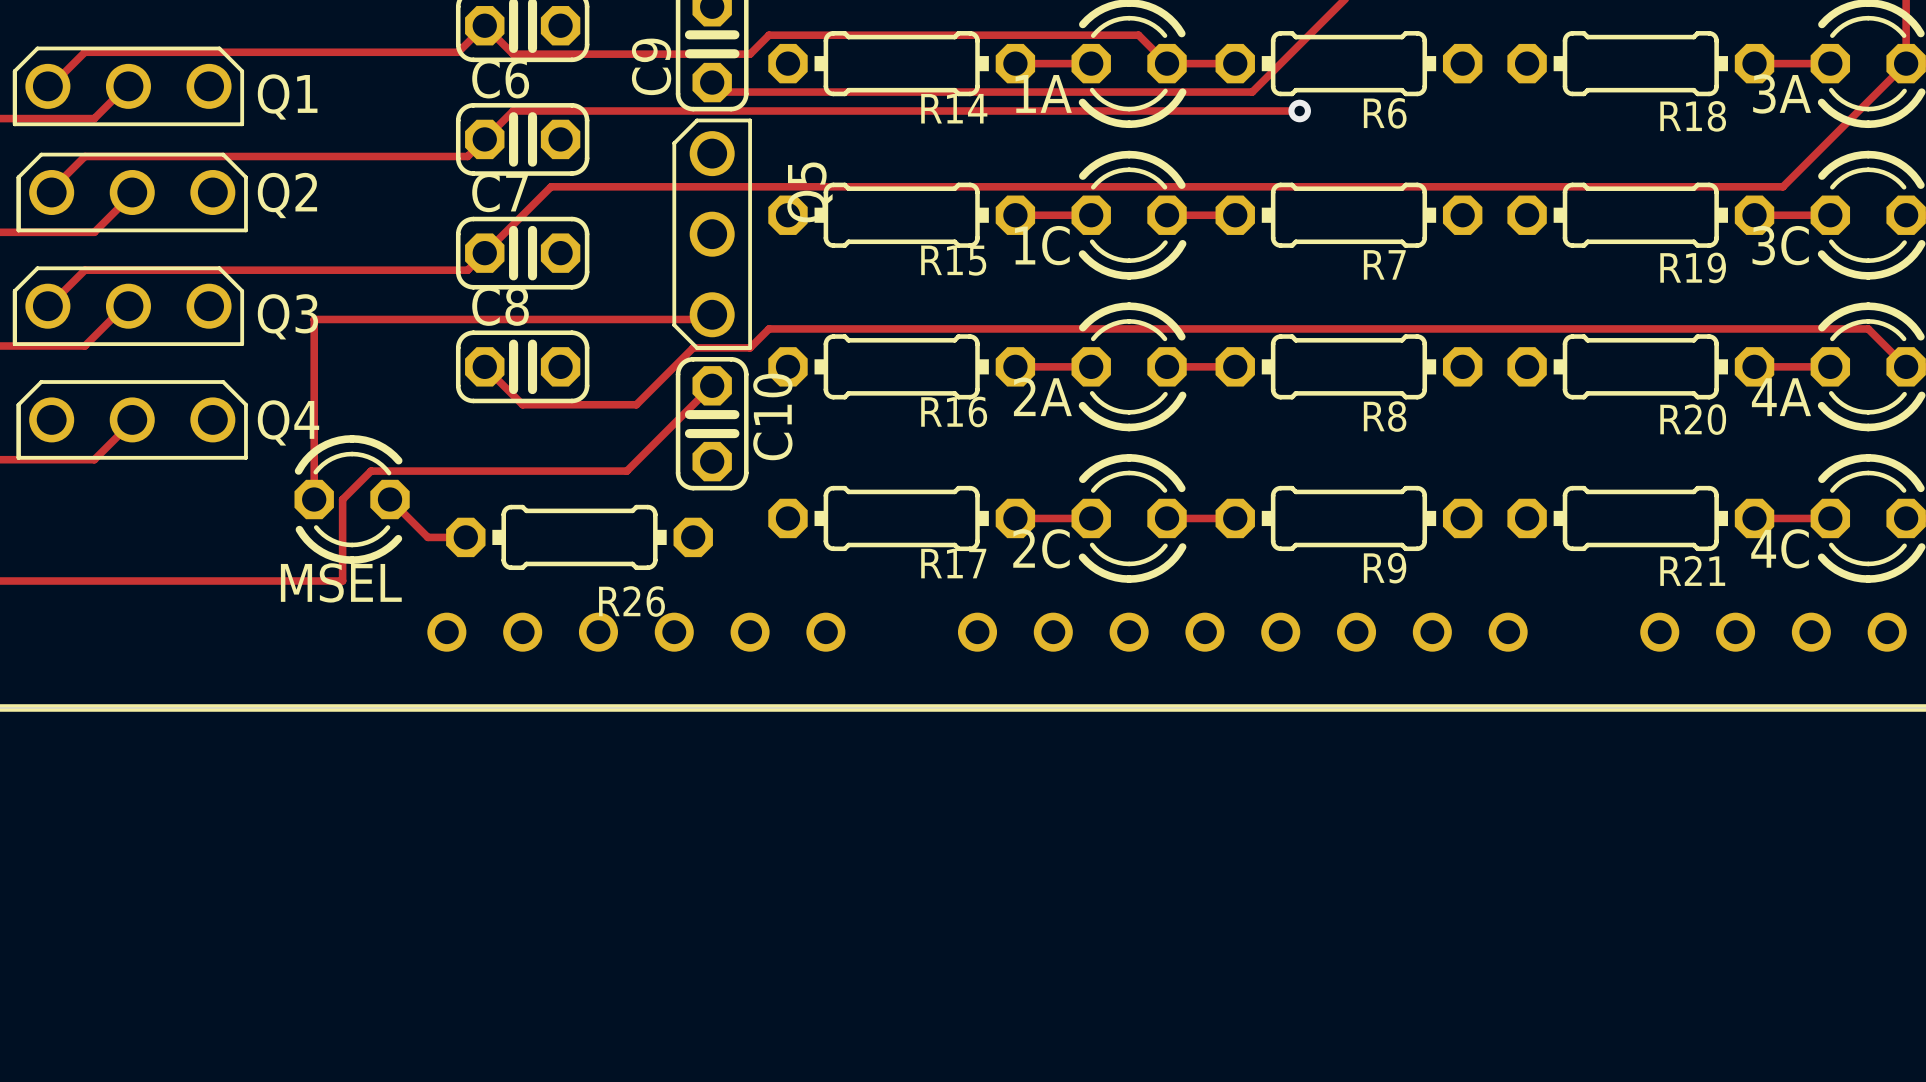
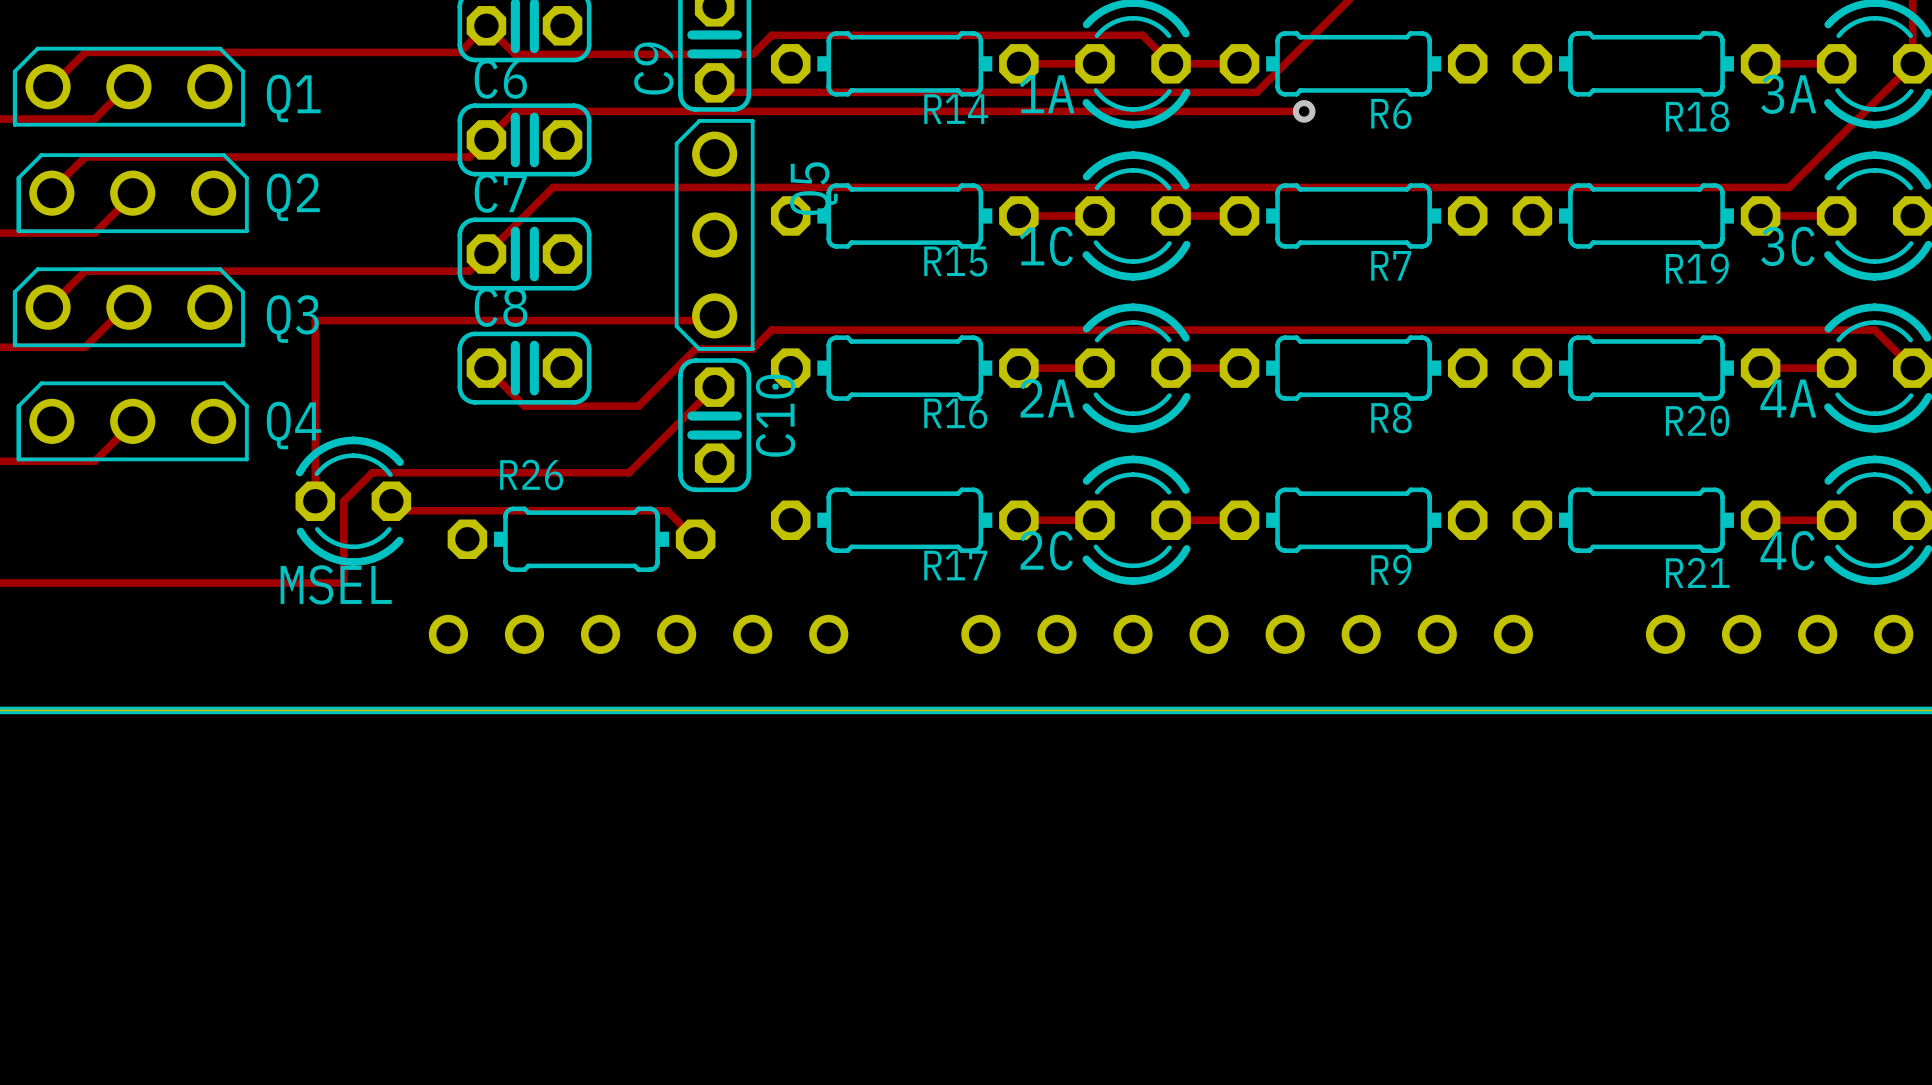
track: (399, 508) (427, 537) (465, 537) -> (400, 510) (667, 510) (695, 539)
R26 name position: R26 (631, 601) -> R26 (531, 474)

